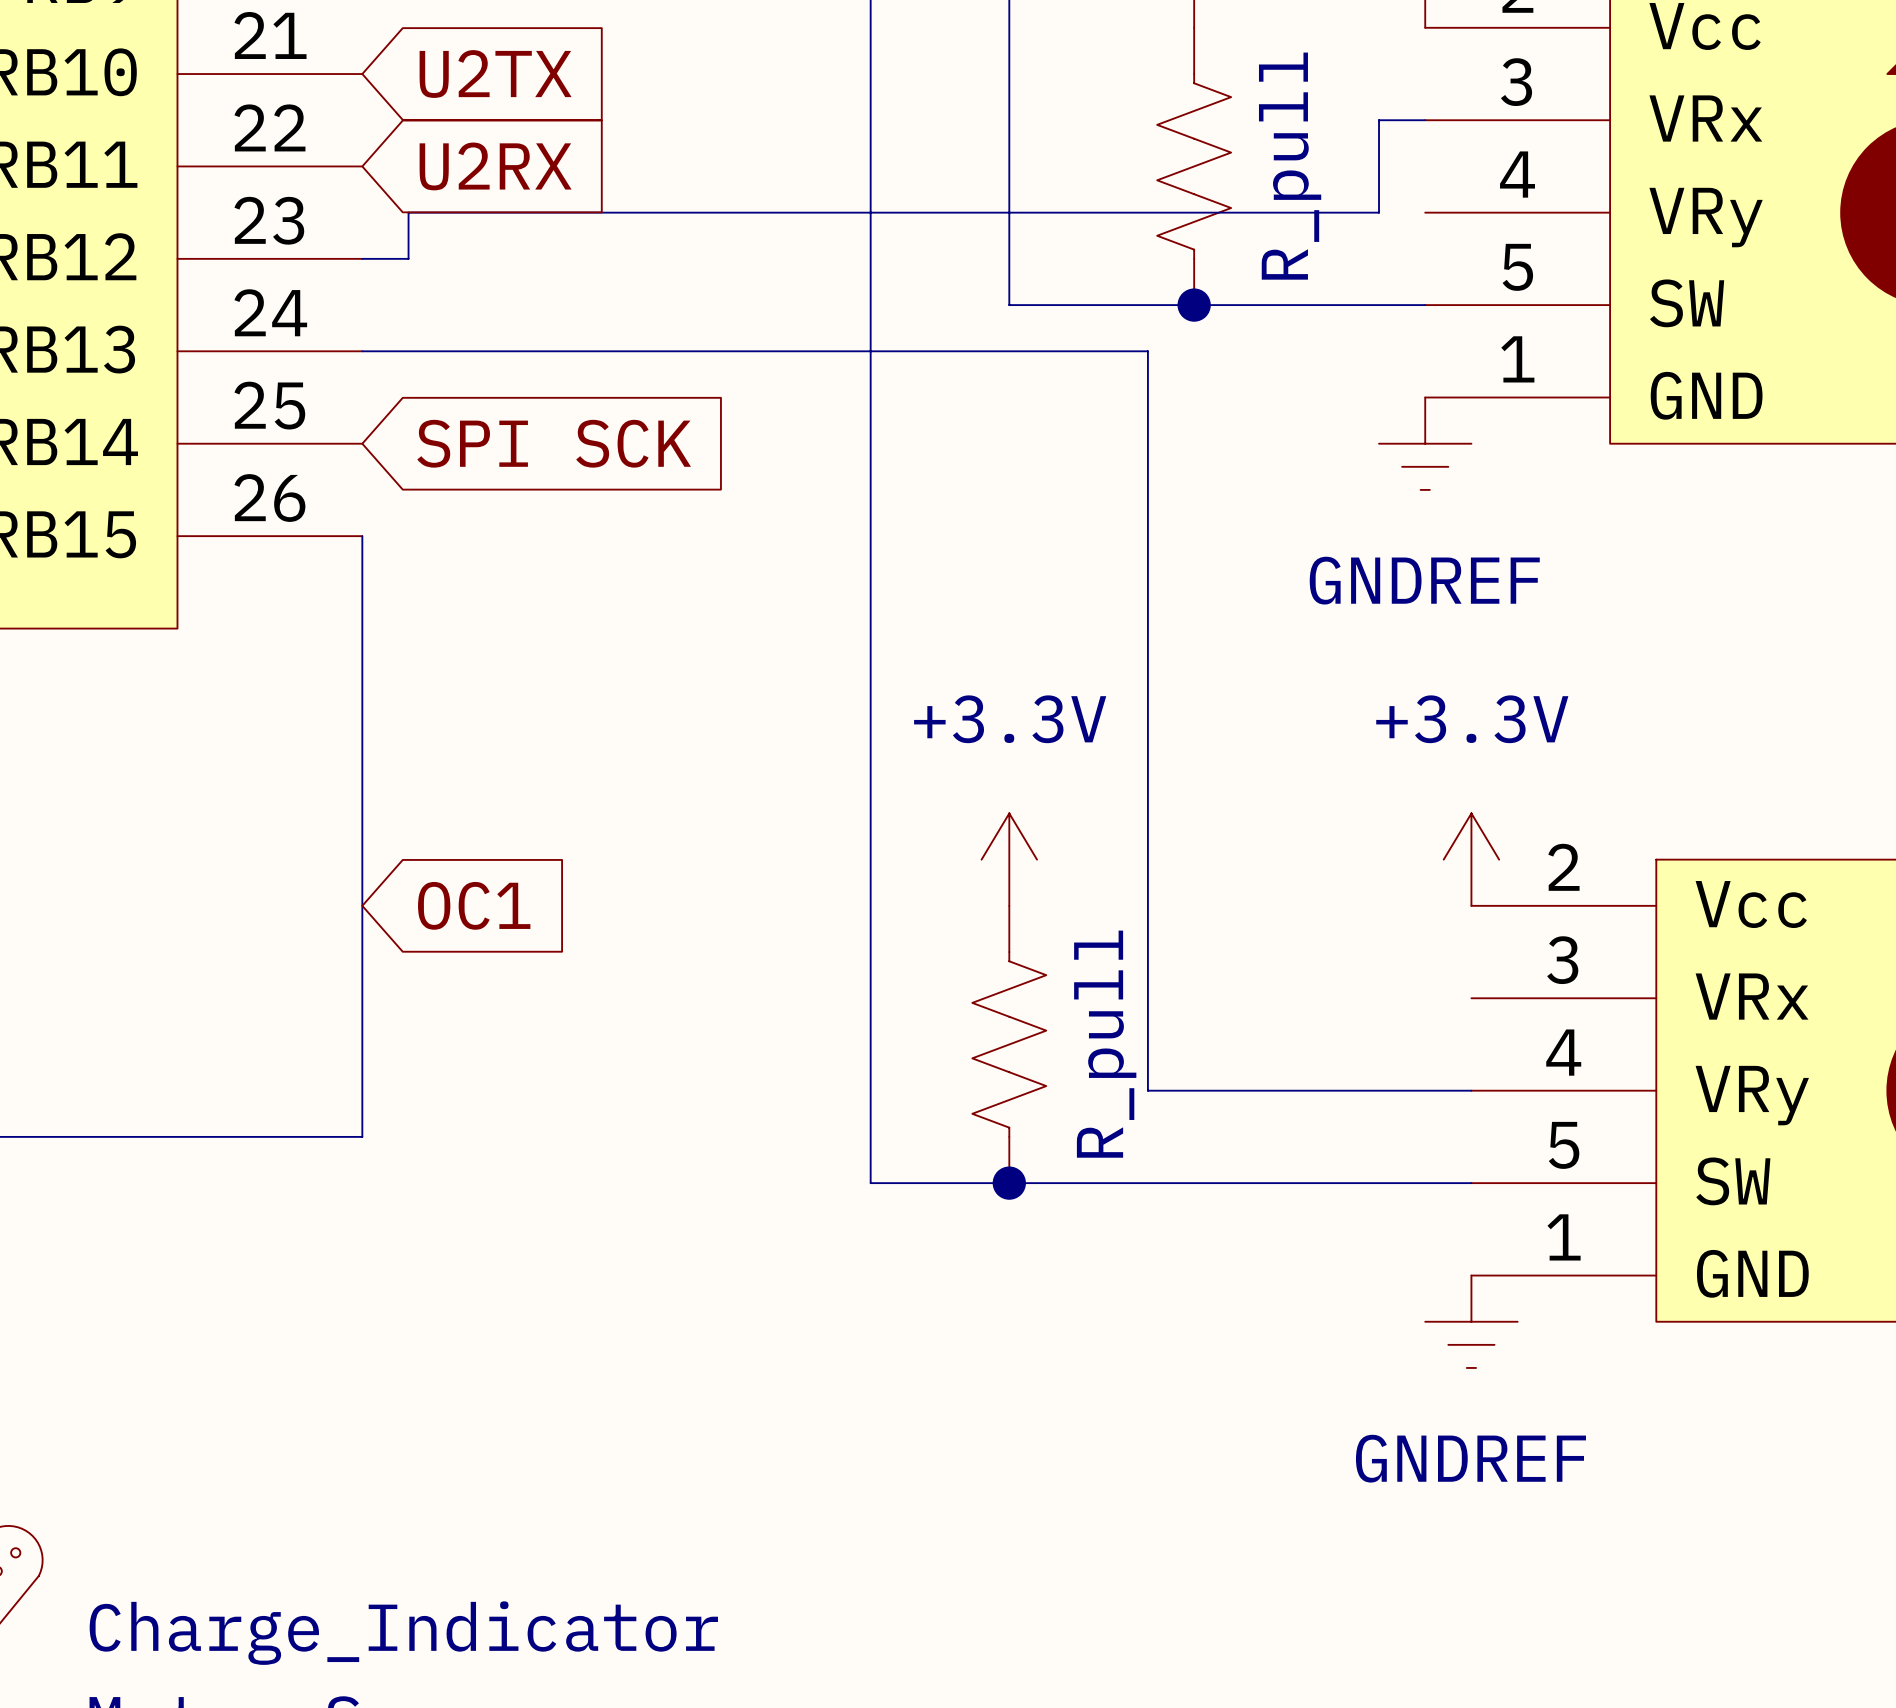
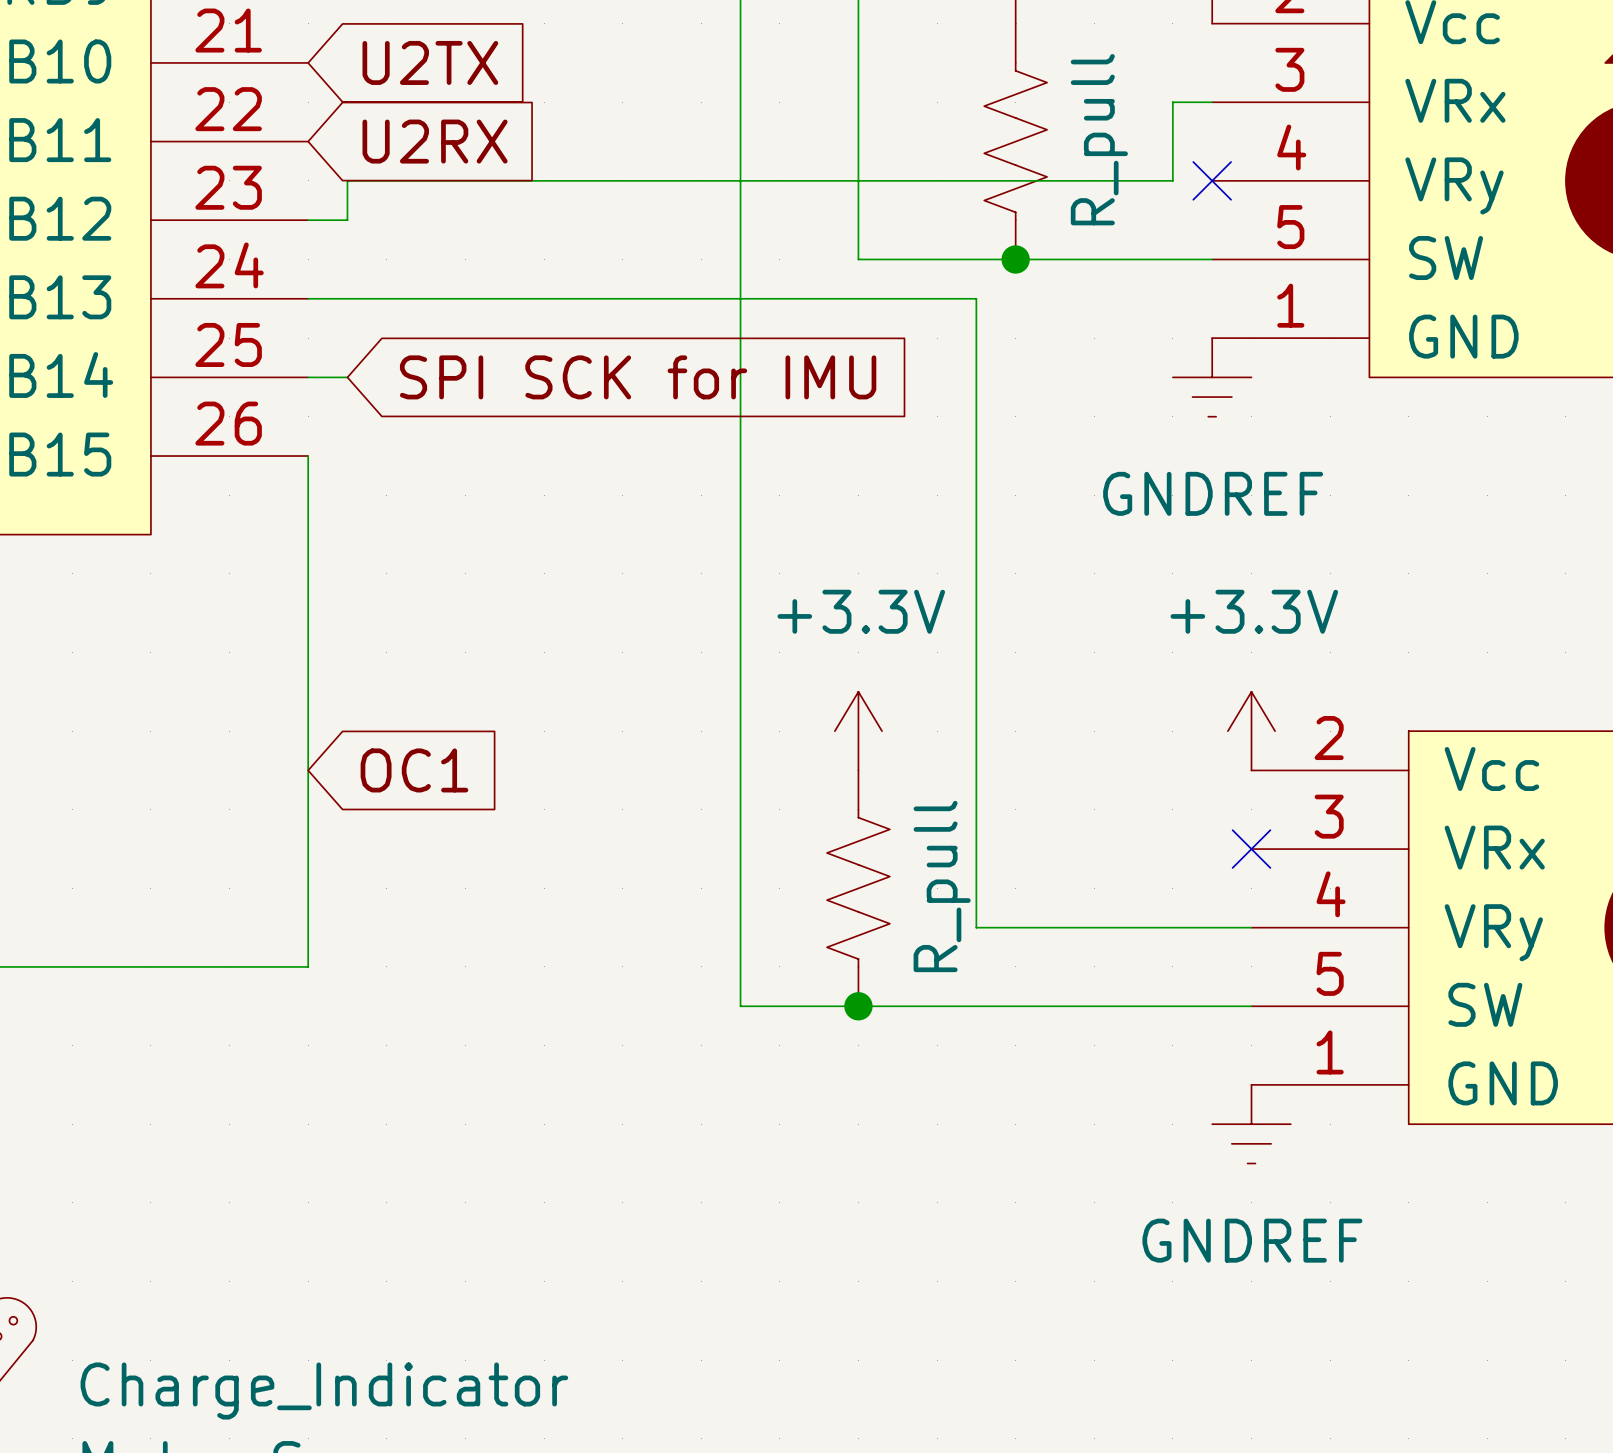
no-connect mark: none -> (1212, 180)
wire: none -> (308, 377) (347, 377)
global label: SPI SCK (554, 443) -> SPI SCK for IMU (638, 377)
no-connect mark: none -> (1251, 849)

